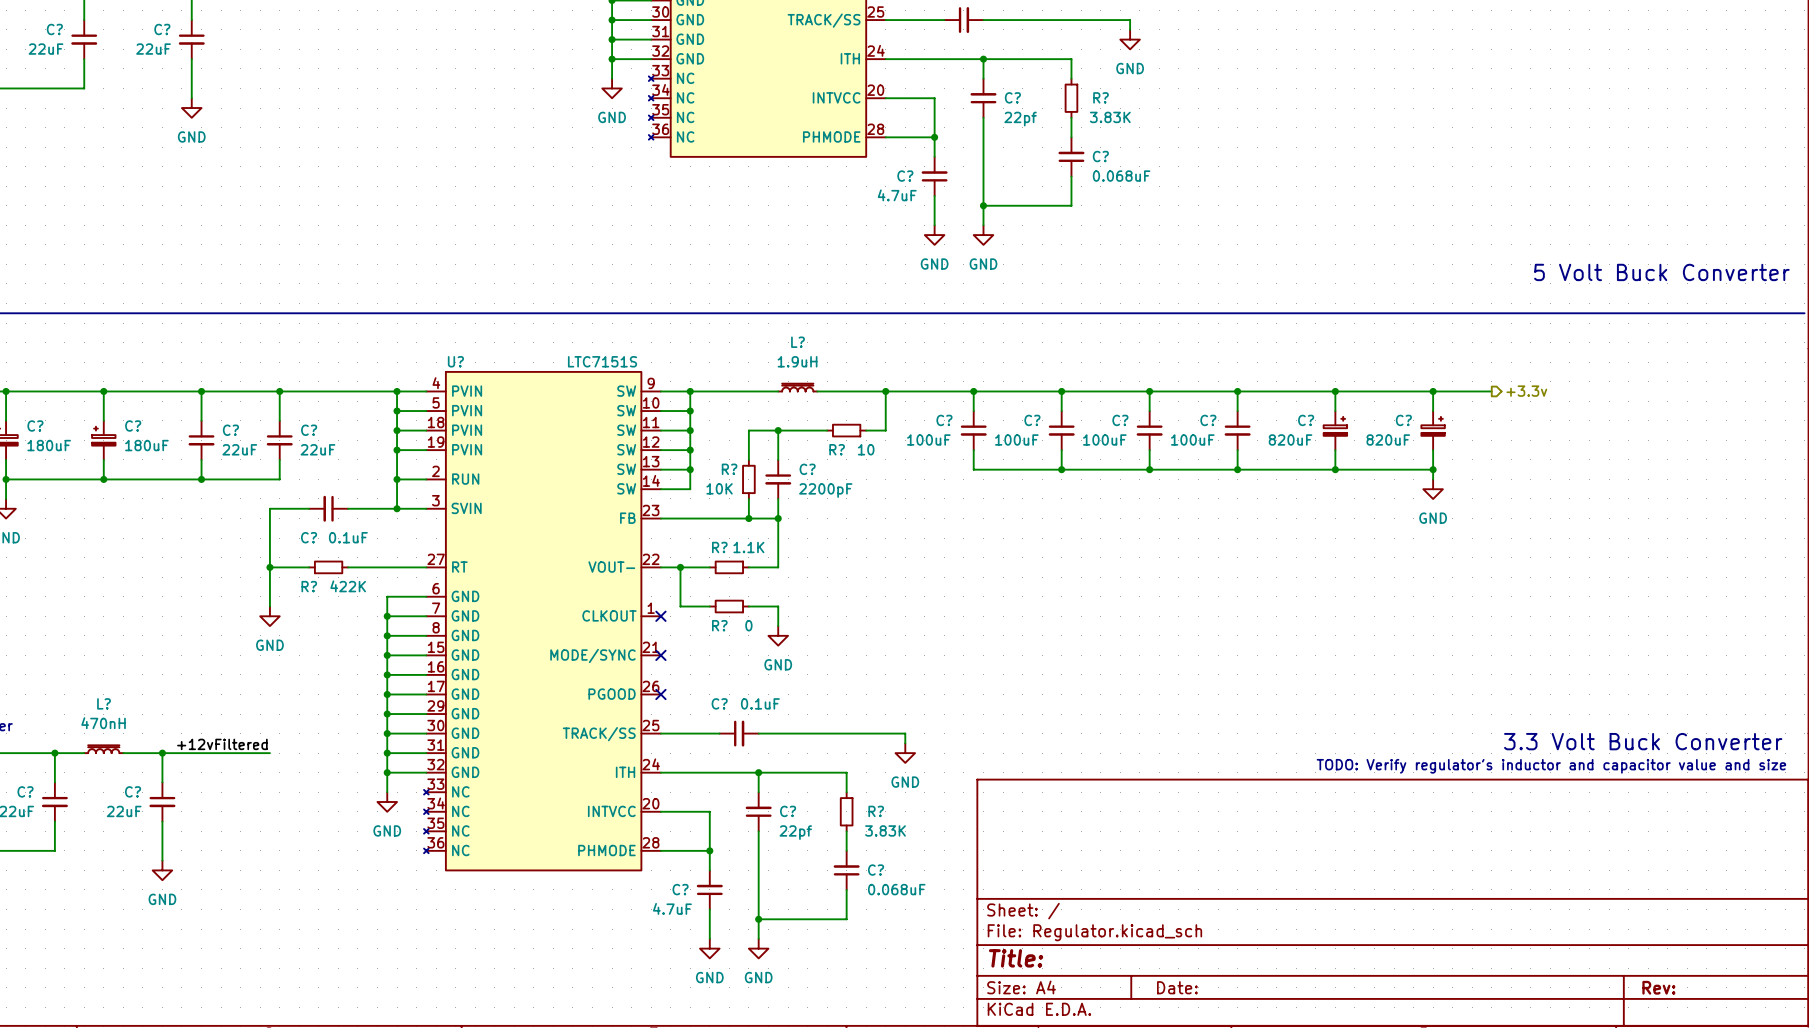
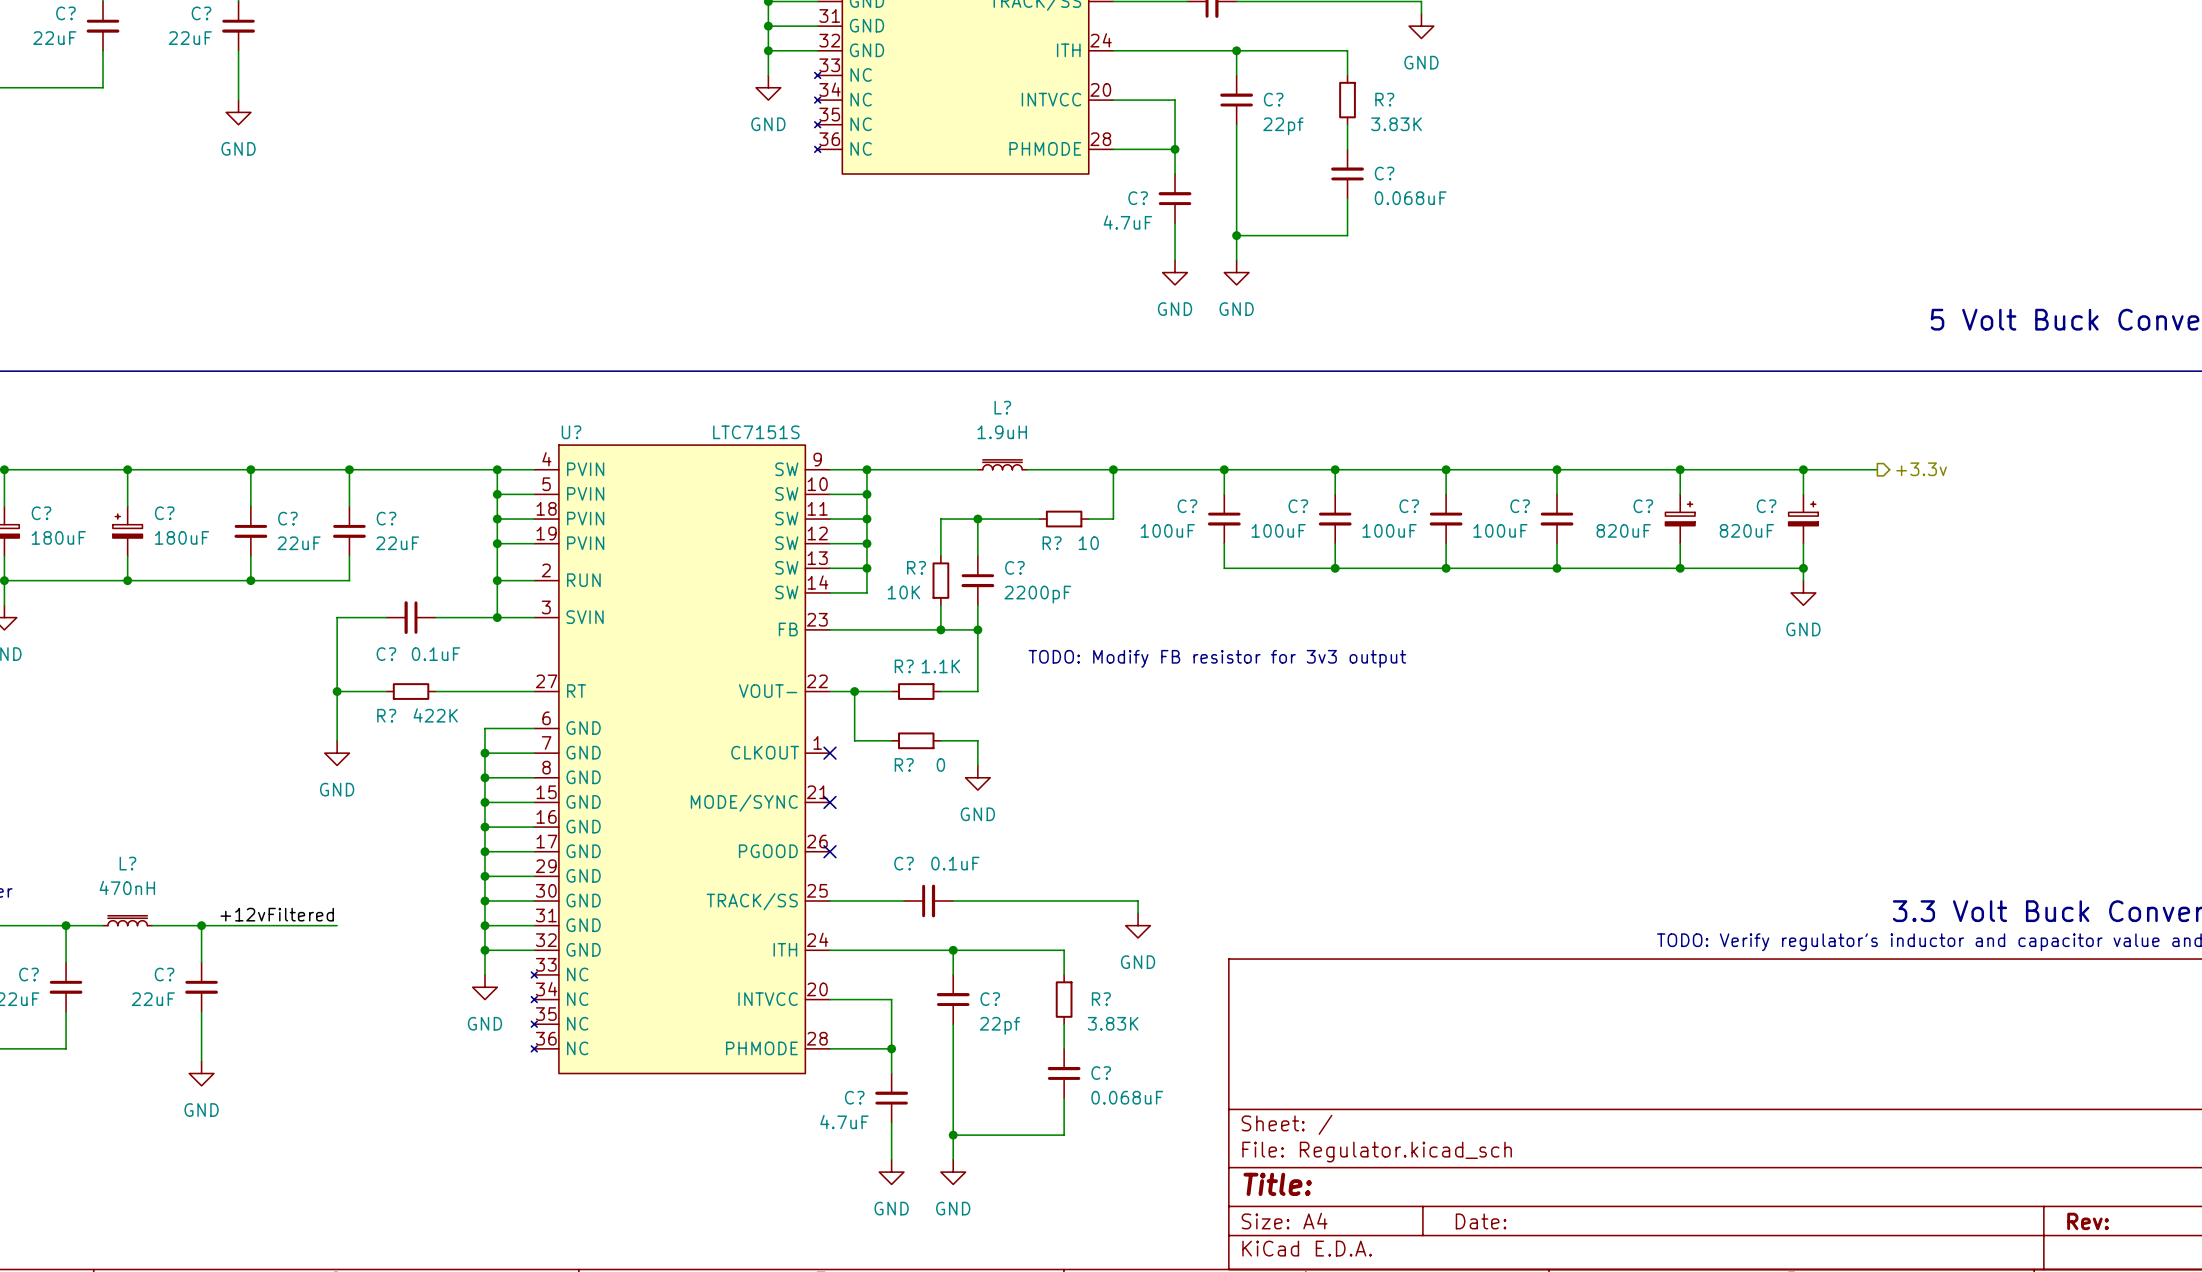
text: none -> TODO: Modify FB resistor for 3v3 output (1217, 658)

